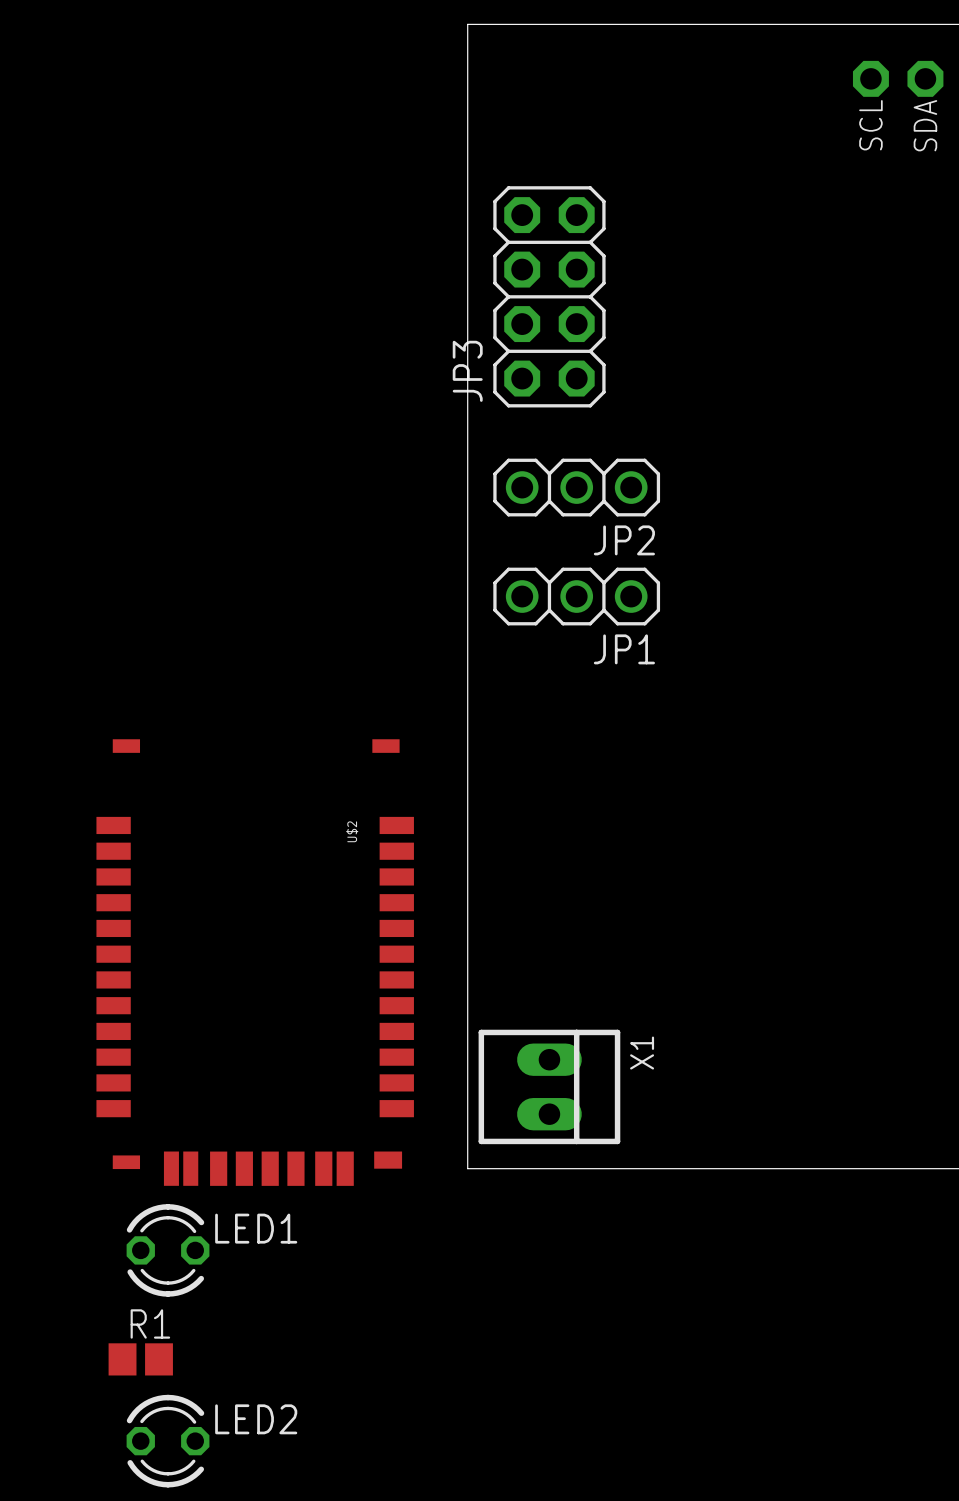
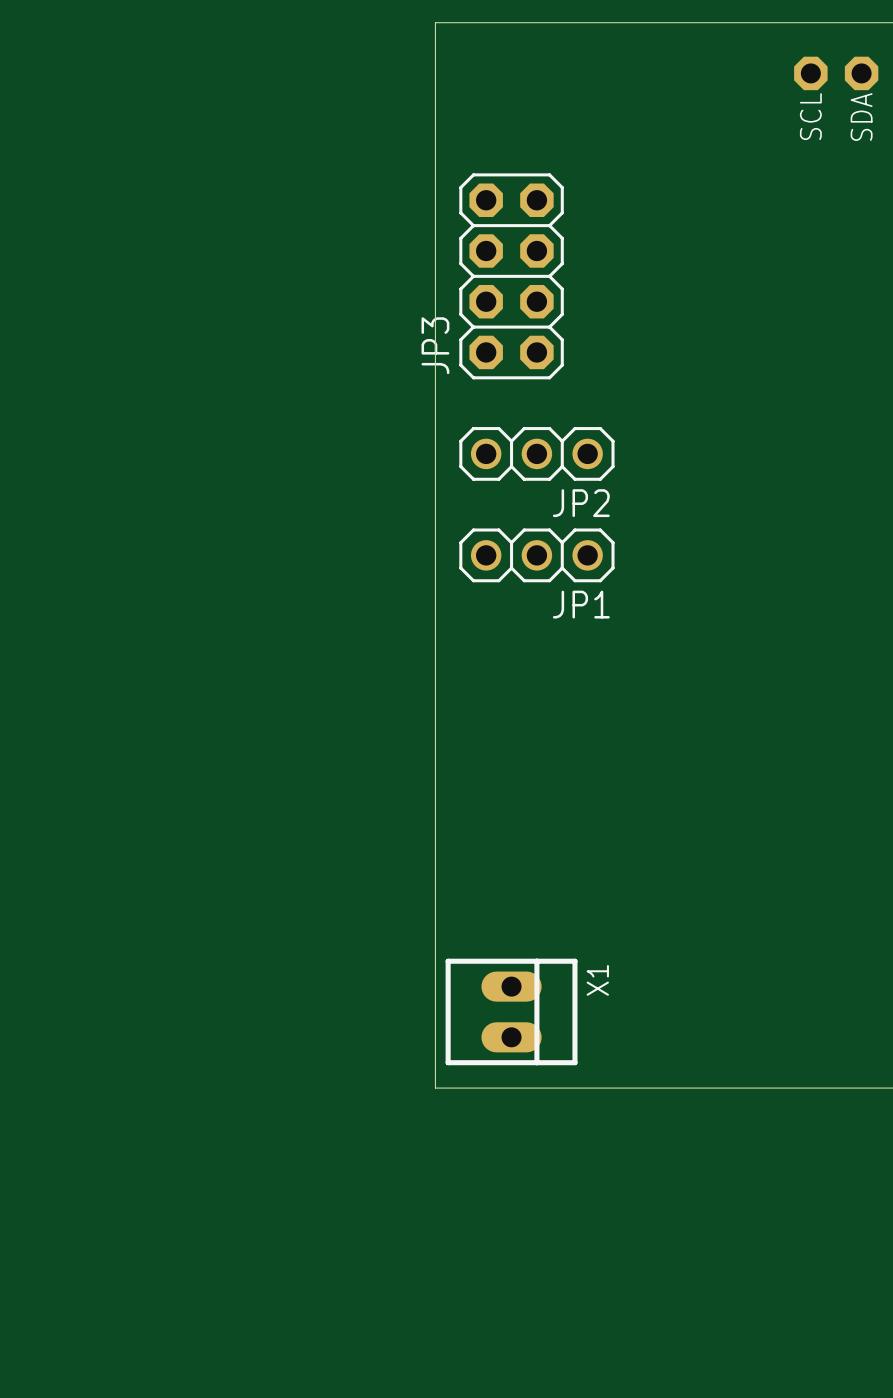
U$2: (255, 962) -> none
LED1: (168, 1250) -> none
R1: (140, 1359) -> none
LED2: (168, 1441) -> none

